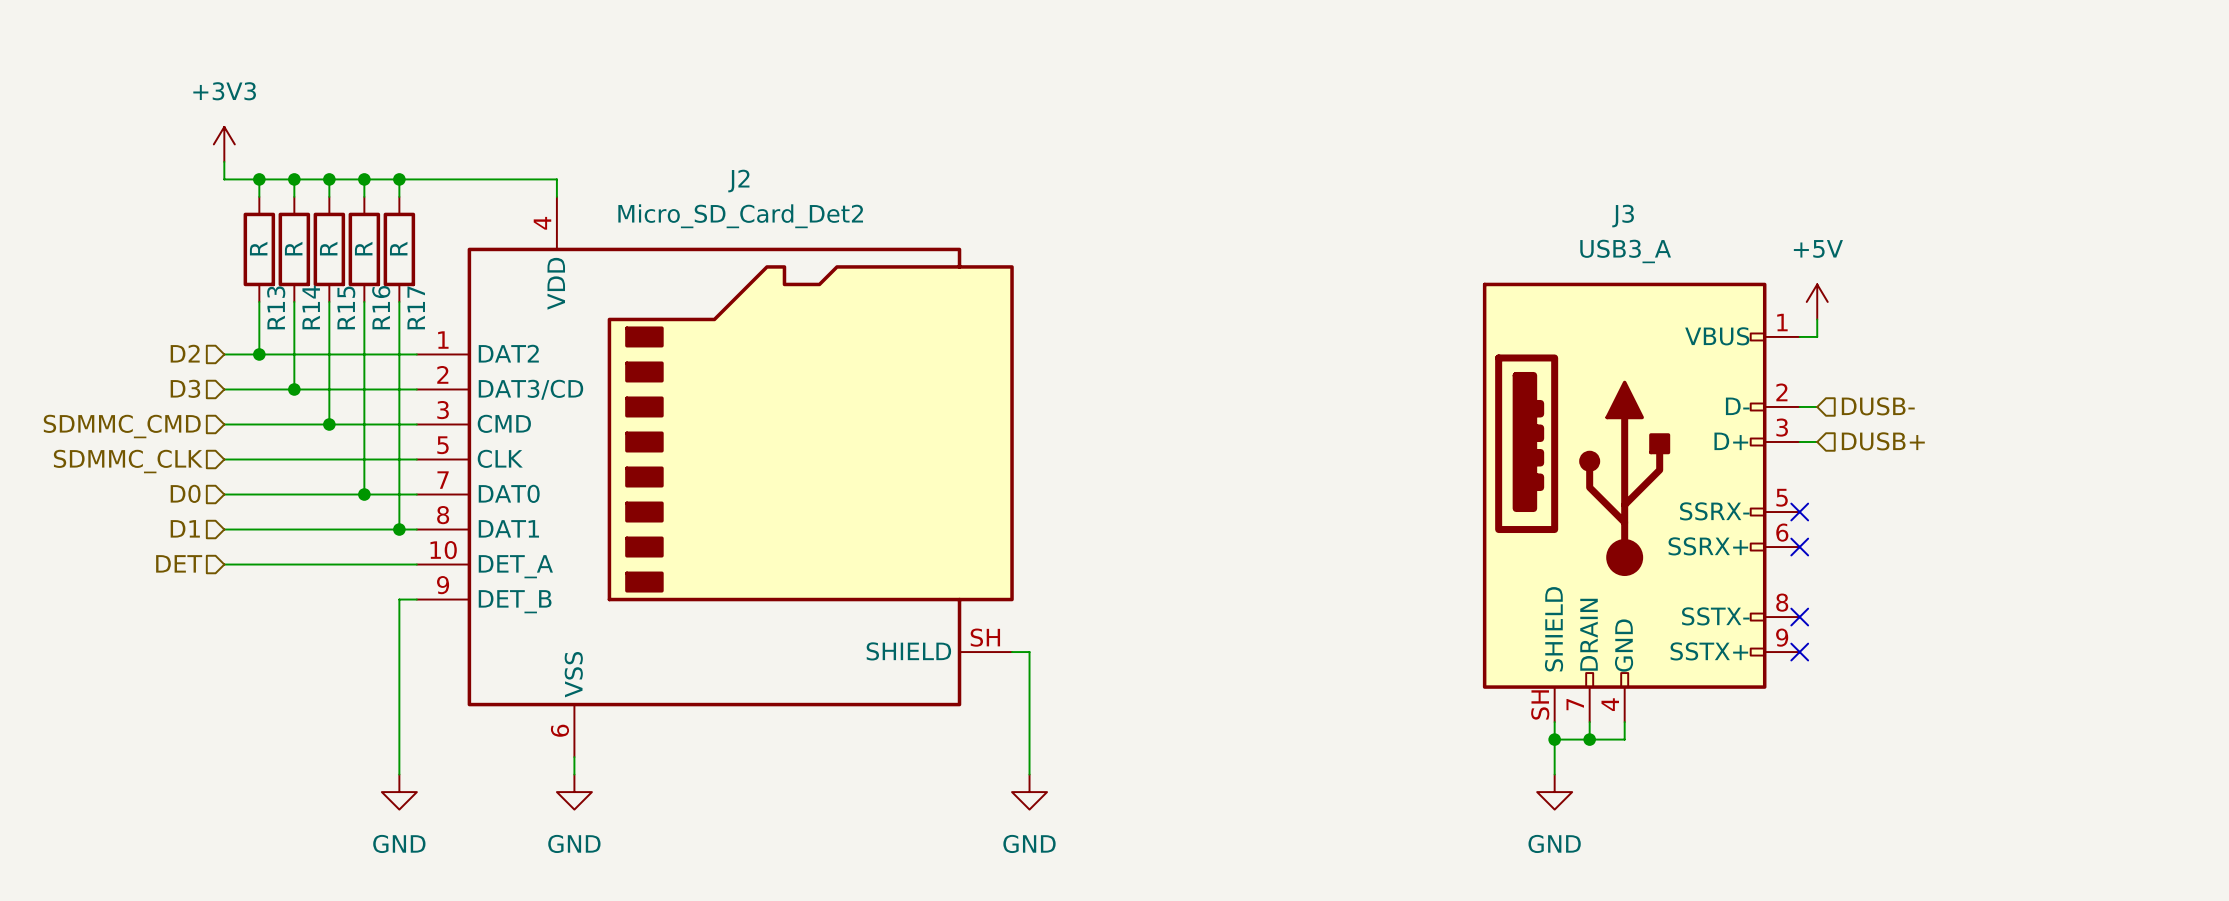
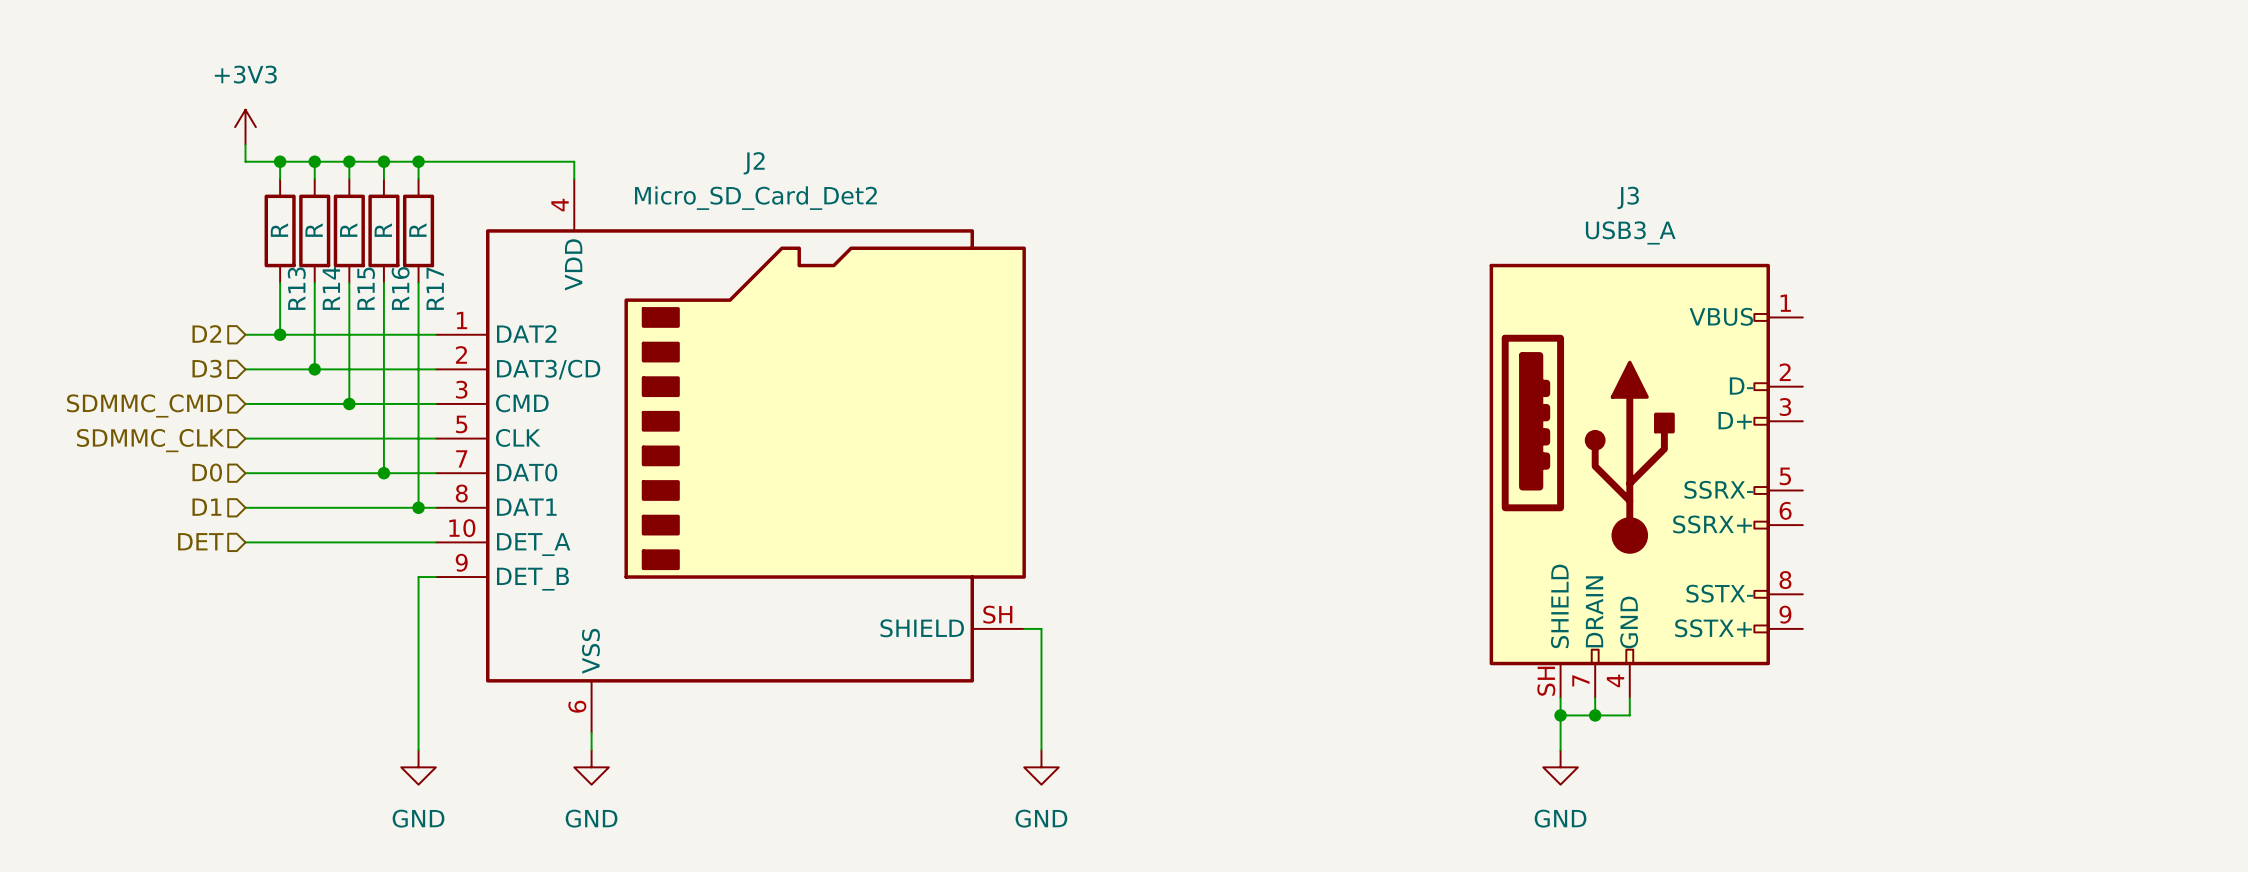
power symbol: +5V (1817, 301) -> none
wire: (1817, 319) (1817, 336) (1799, 336) -> none
wire: (1799, 406) (1817, 406) -> none
hierarchical label: DUSB- (1878, 406) -> none
wire: (1799, 441) (1817, 441) -> none
hierarchical label: DUSB+ (1883, 441) -> none
no-connect mark: (1799, 512) -> none
no-connect mark: (1799, 547) -> none
no-connect mark: (1799, 617) -> none
no-connect mark: (1799, 652) -> none

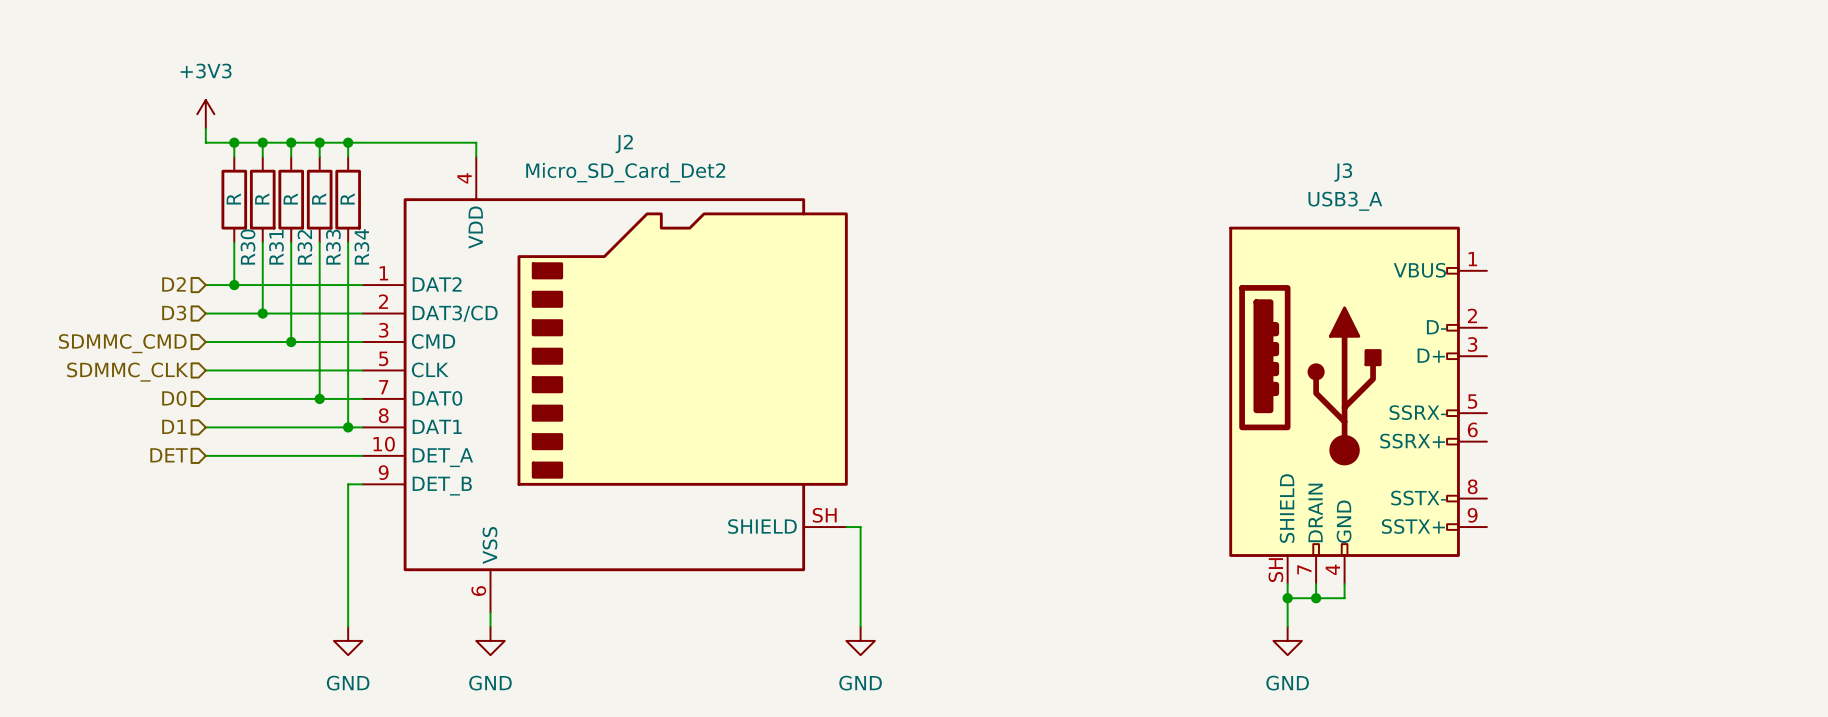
R13 name: R13 (296, 288) -> R30 (247, 247)
R14 name: R14 (331, 288) -> R31 (276, 247)
R15 name: R15 (366, 288) -> R32 (304, 247)
R16 name: R16 (400, 288) -> R33 (333, 247)
R17 name: R17 (435, 288) -> R34 (361, 246)

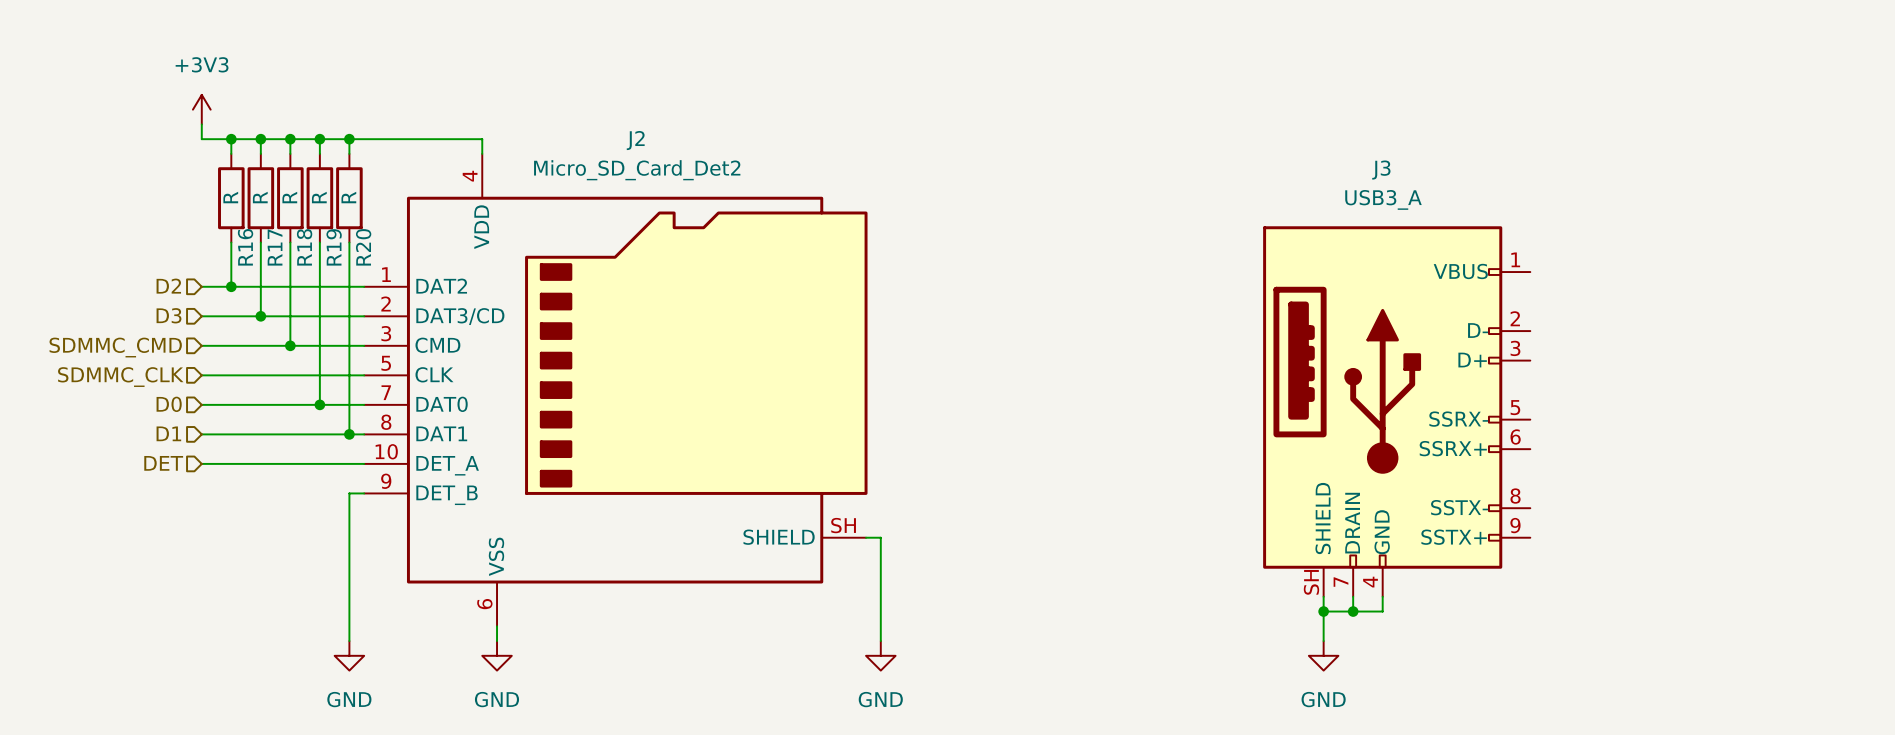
R34 name: R34 (361, 246) -> R20 (363, 247)
R30 name: R30 (247, 247) -> R16 (245, 247)
R31 name: R31 (276, 247) -> R17 (275, 247)
R32 name: R32 (304, 247) -> R18 (304, 247)
R33 name: R33 (333, 247) -> R19 (334, 247)

